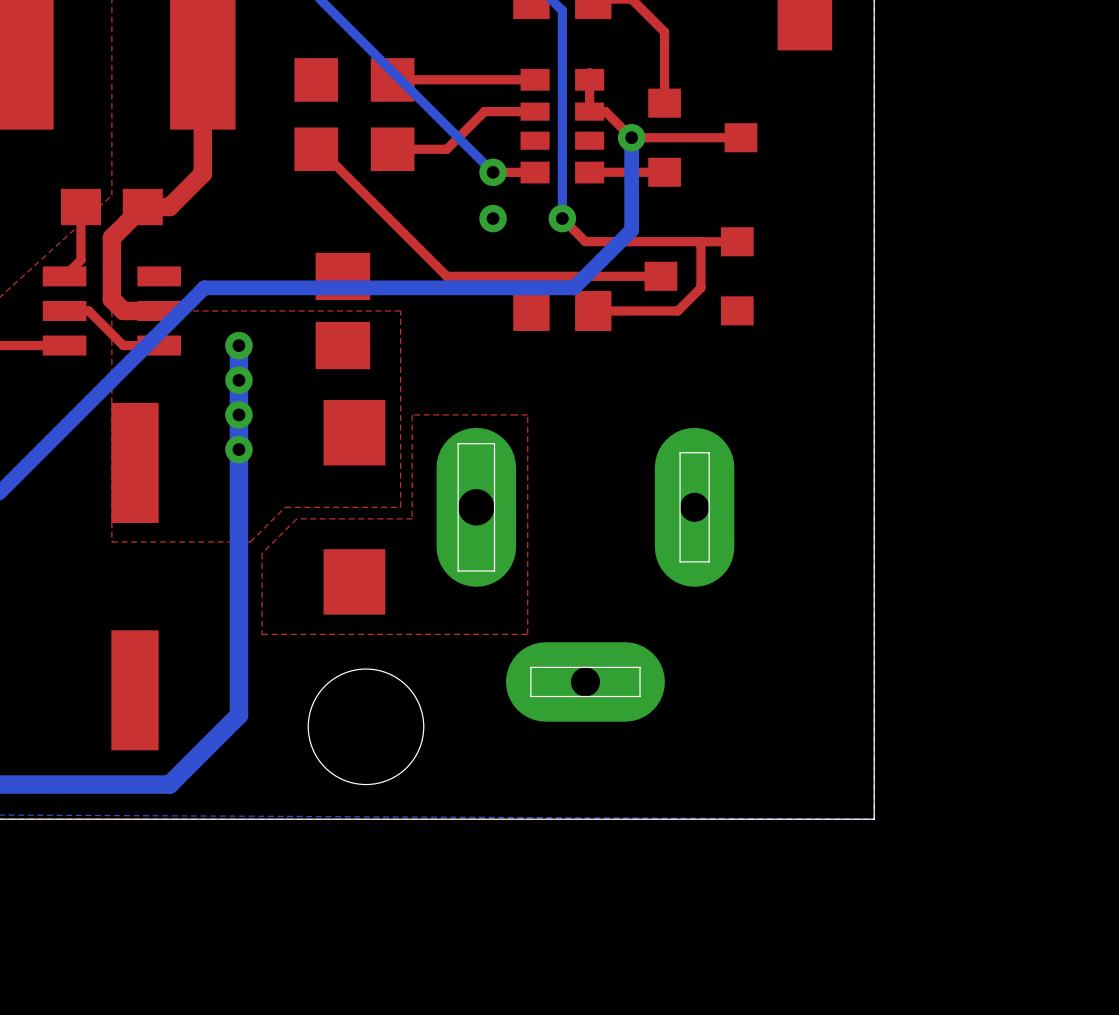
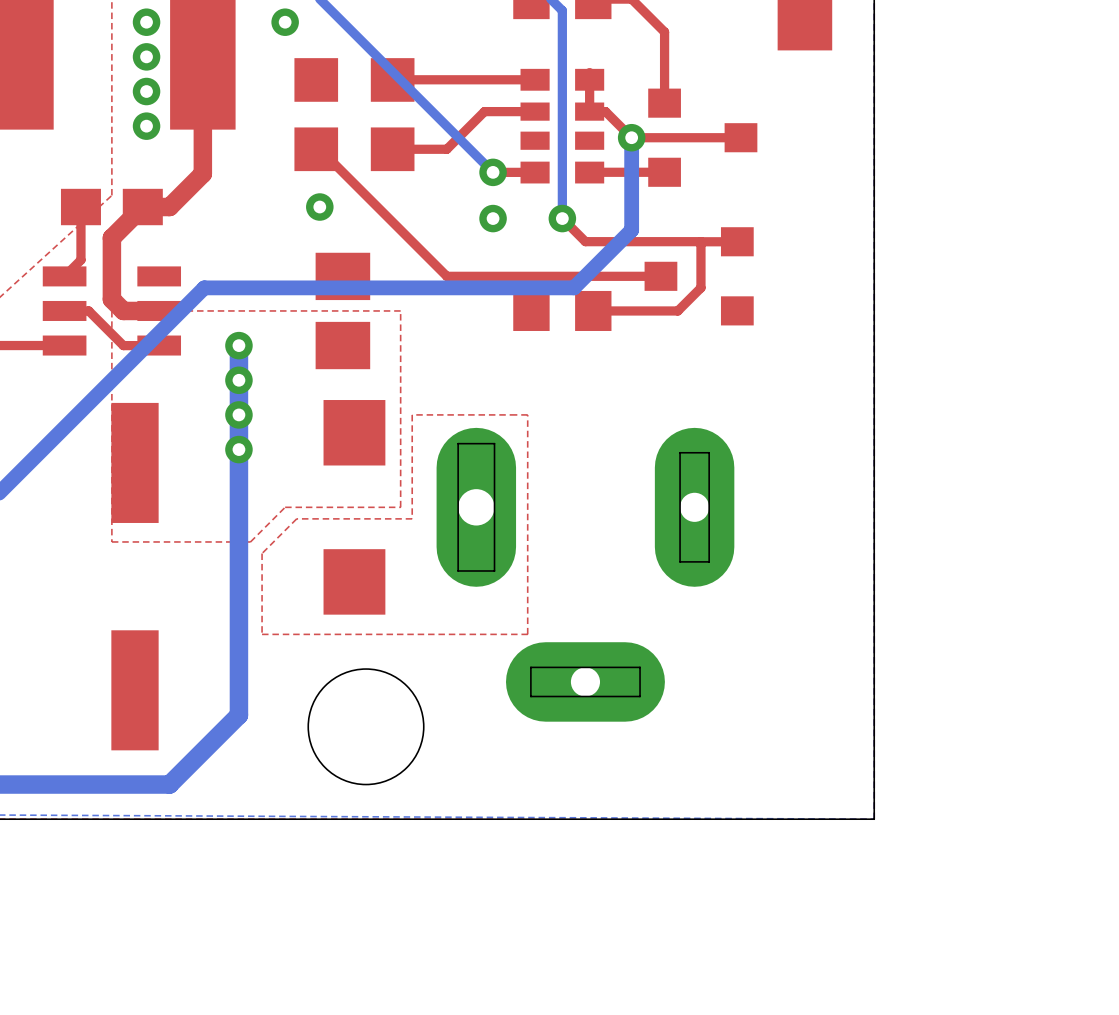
via: none -> (146, 22)
via: none -> (285, 22)
via: none -> (146, 56)
via: none -> (146, 91)
via: none -> (146, 126)
via: none -> (319, 207)

